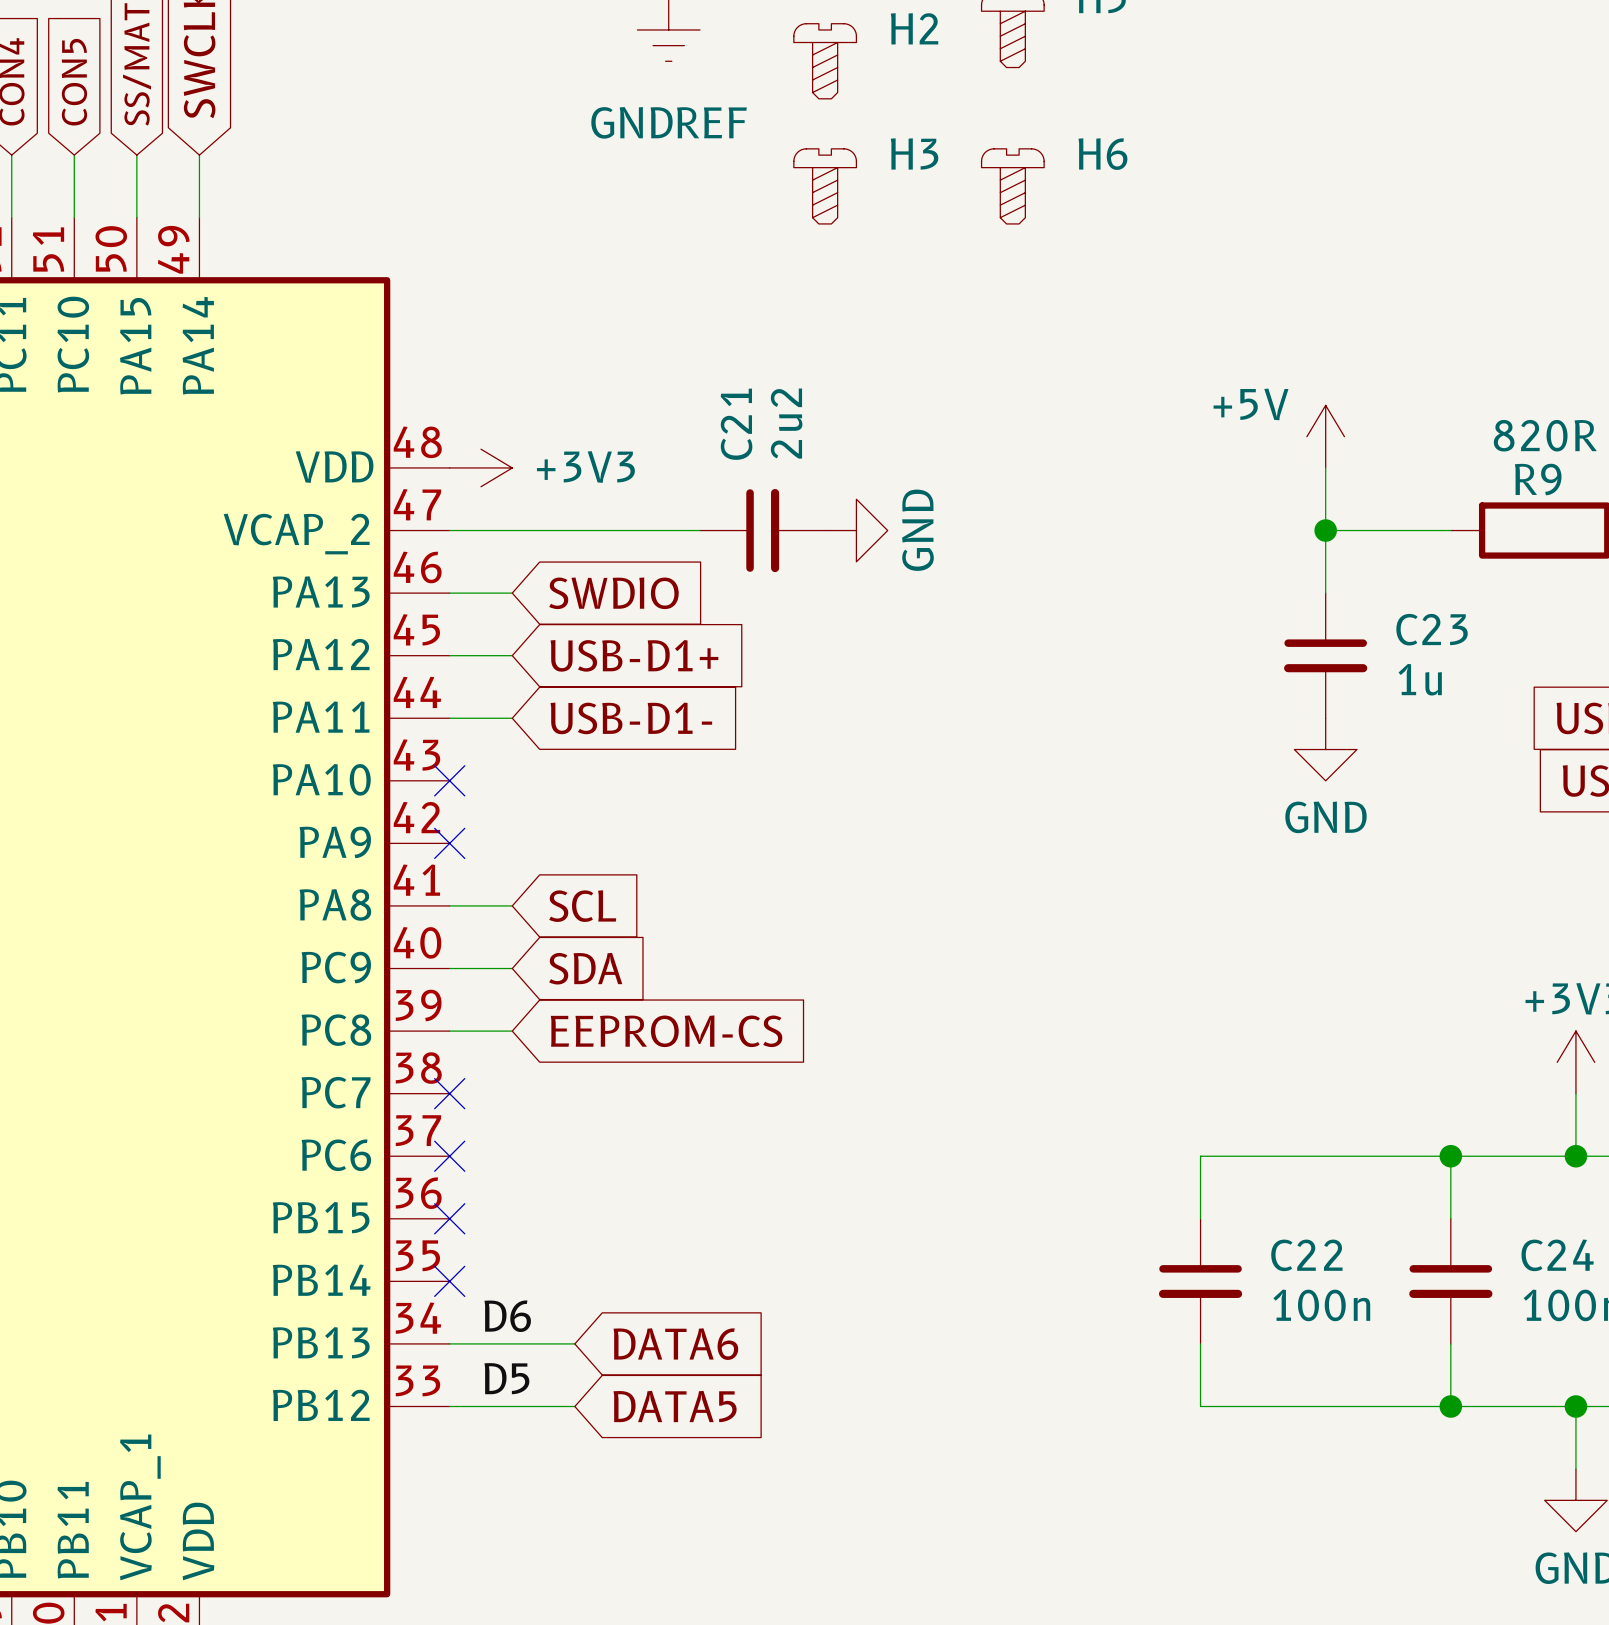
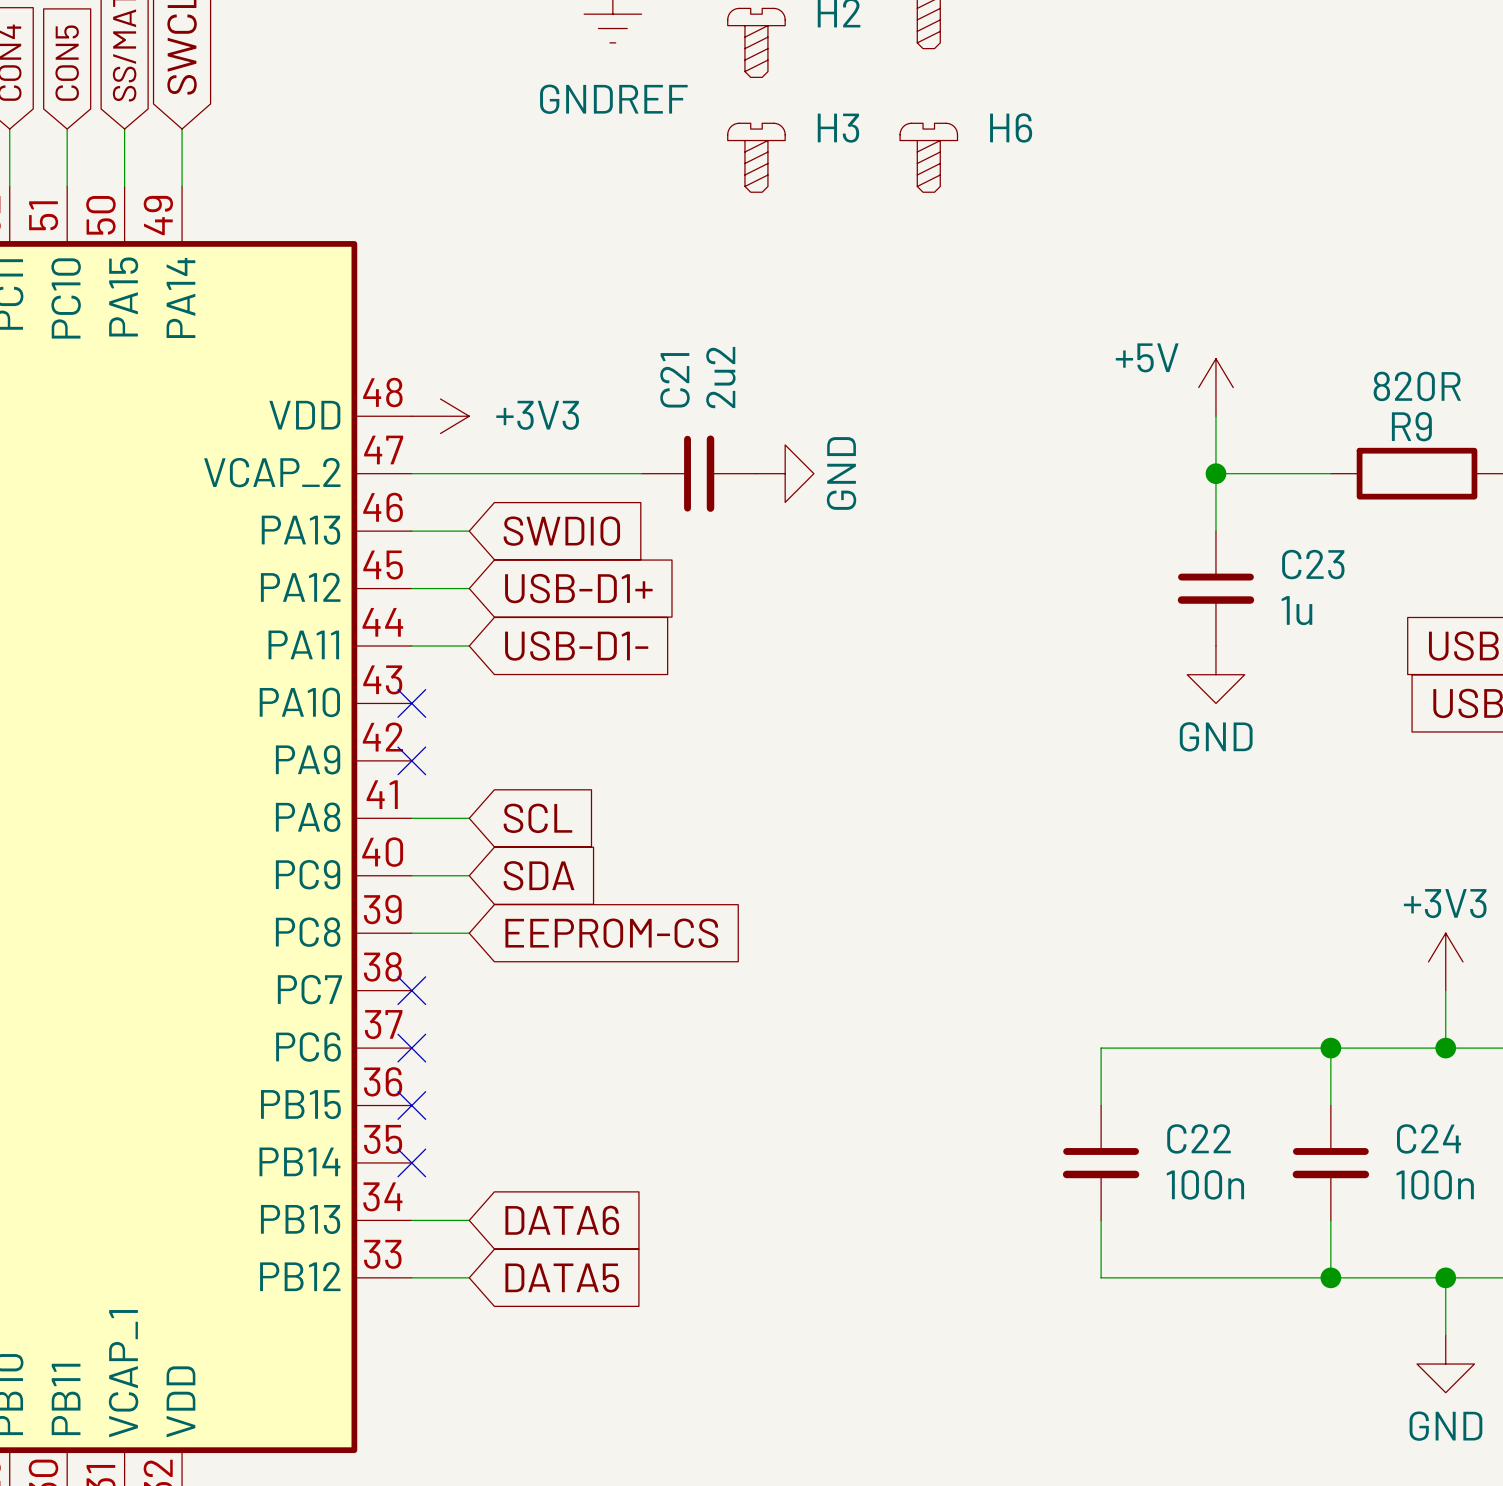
label: D6 (507, 1316) -> none
wire: (512, 1343) (574, 1343) -> none
global label position: DATA6 (675, 1344) -> DATA6 (562, 1220)
label: D5 (506, 1378) -> none
wire: (512, 1406) (574, 1406) -> none
global label position: DATA5 (675, 1406) -> DATA5 (562, 1278)

